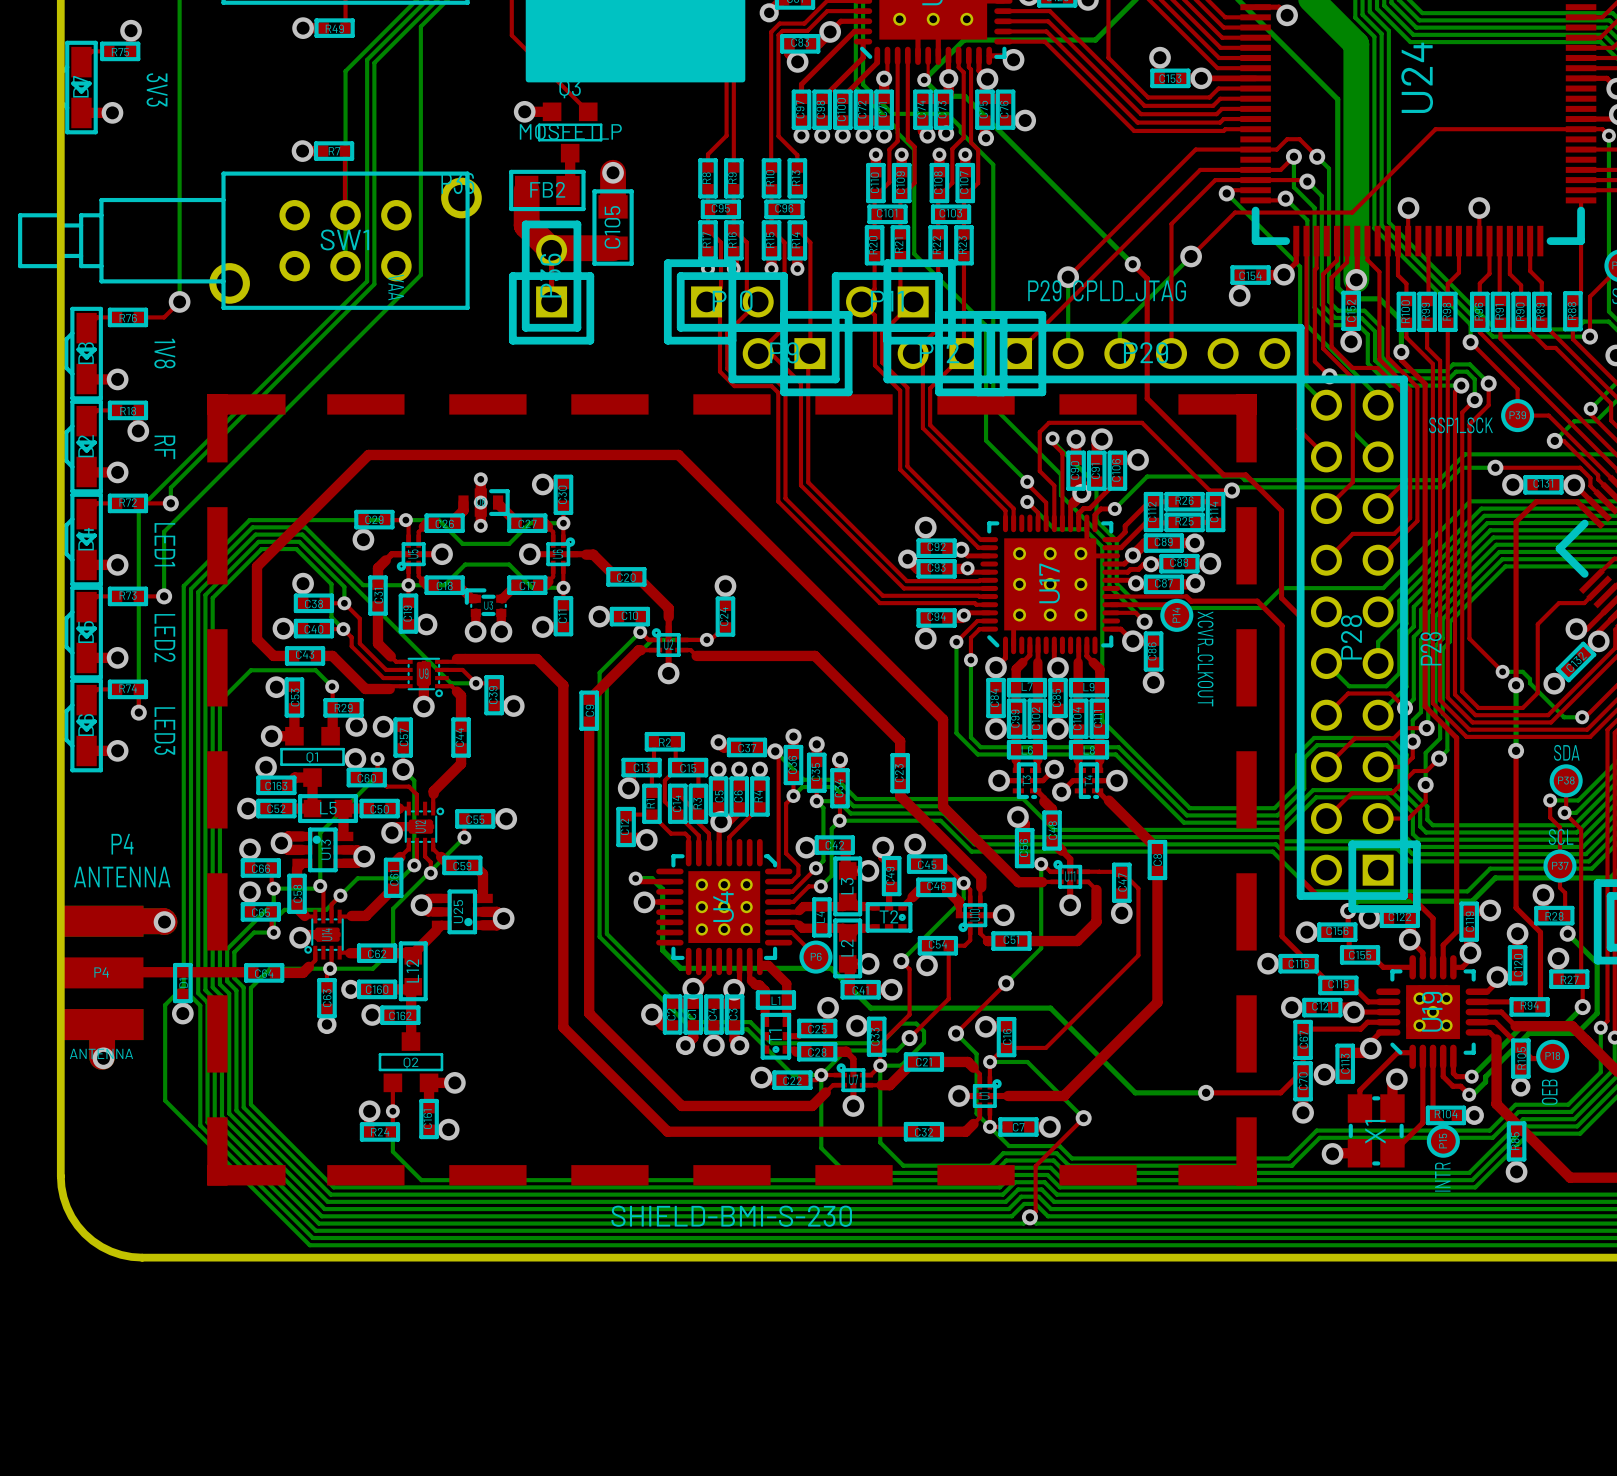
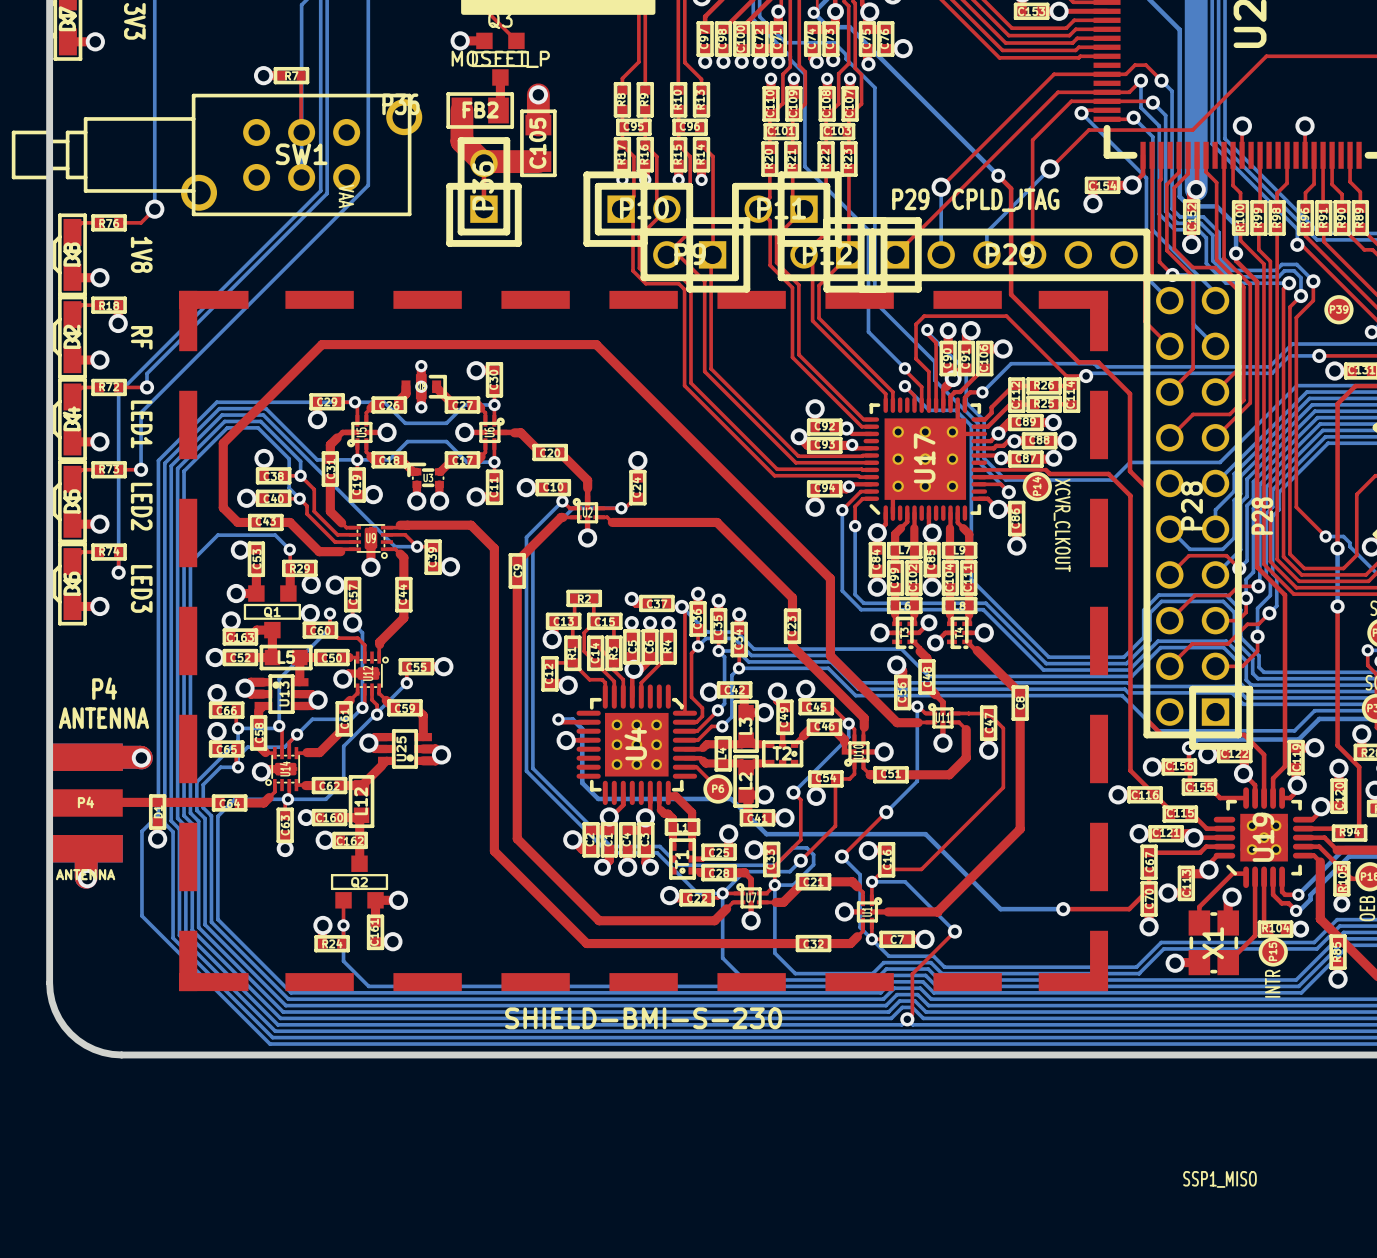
top track: (1470, 342) (1517, 389) (1517, 415) (1548, 415) -> (1297, 244) (1301, 244) (1366, 309)
text: SSP1_SCK (1460, 425) -> none
text: none -> SSP1_MISO (1219, 1179)

